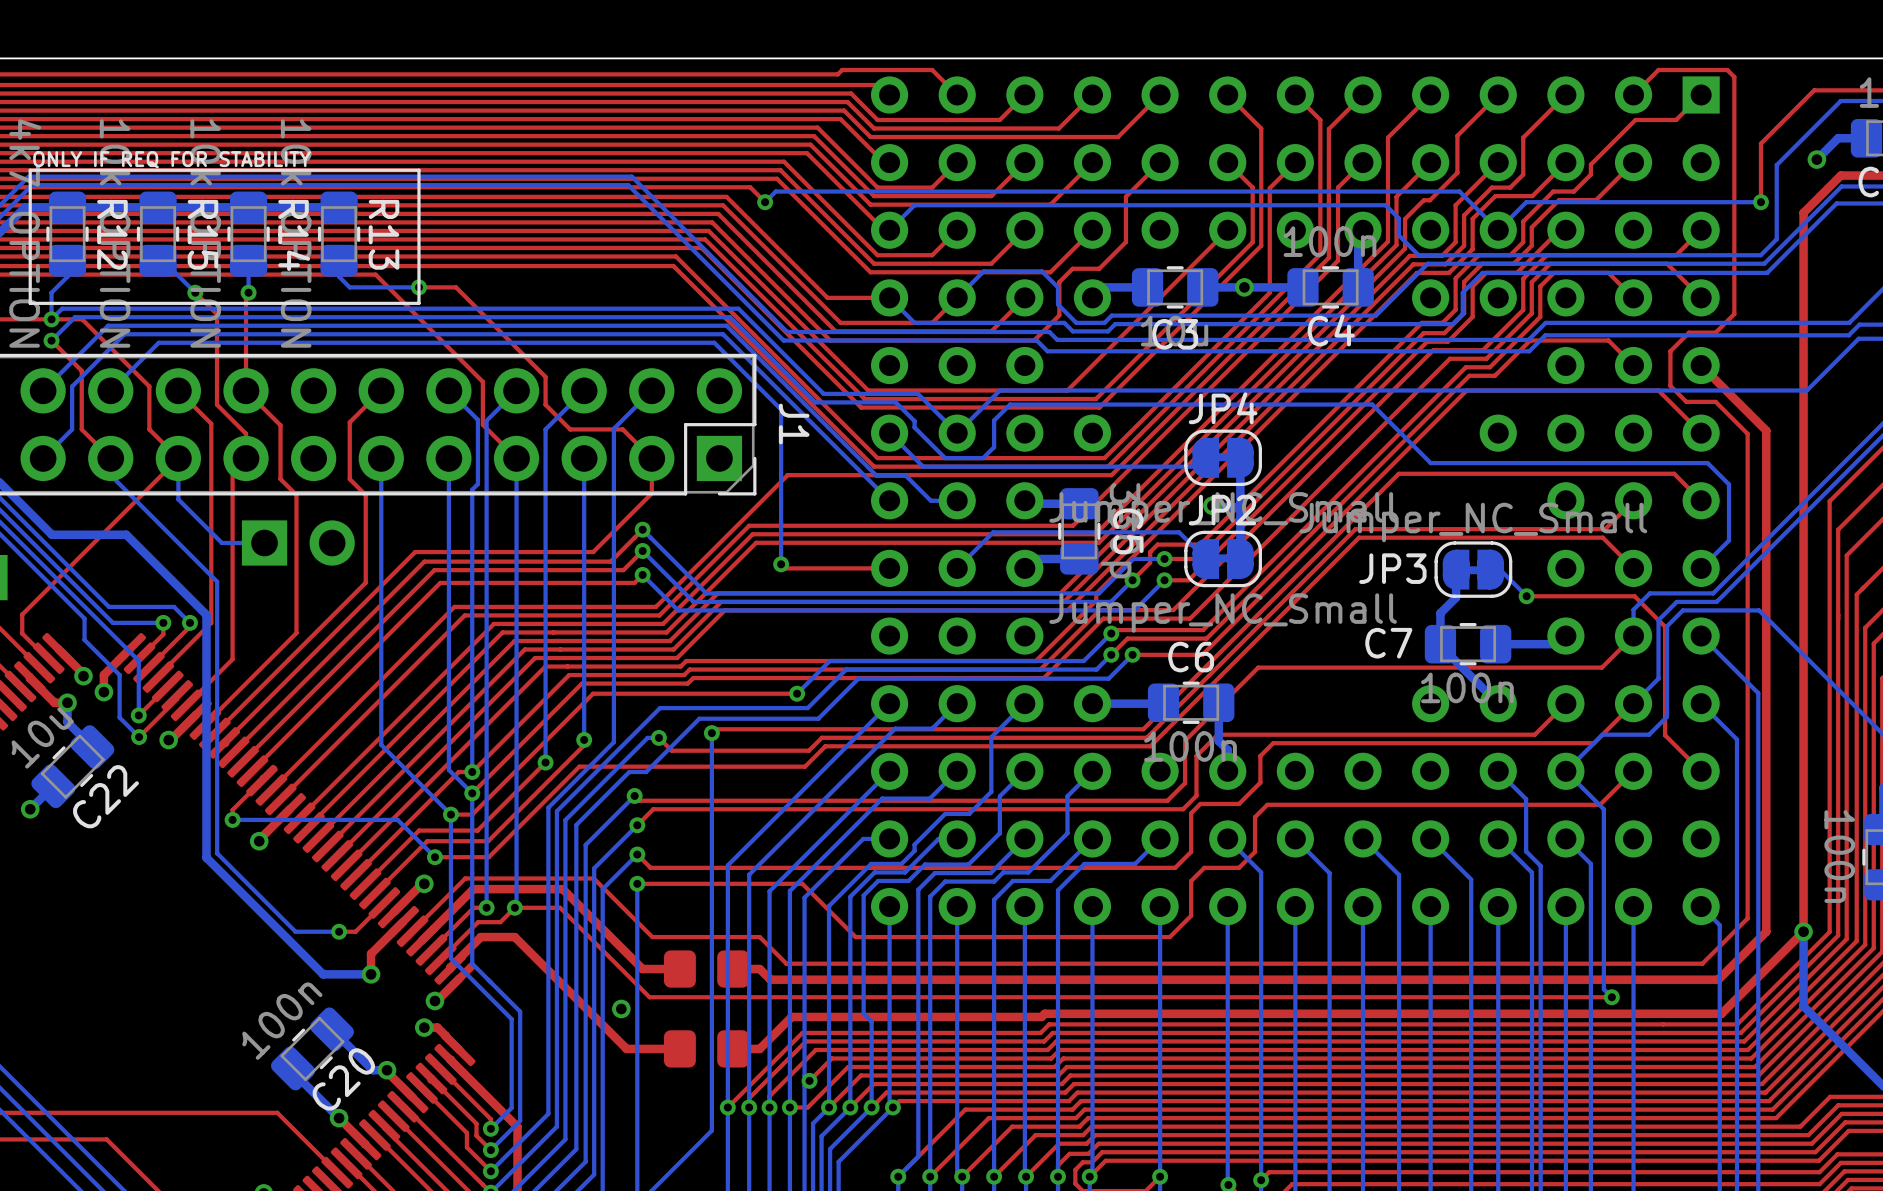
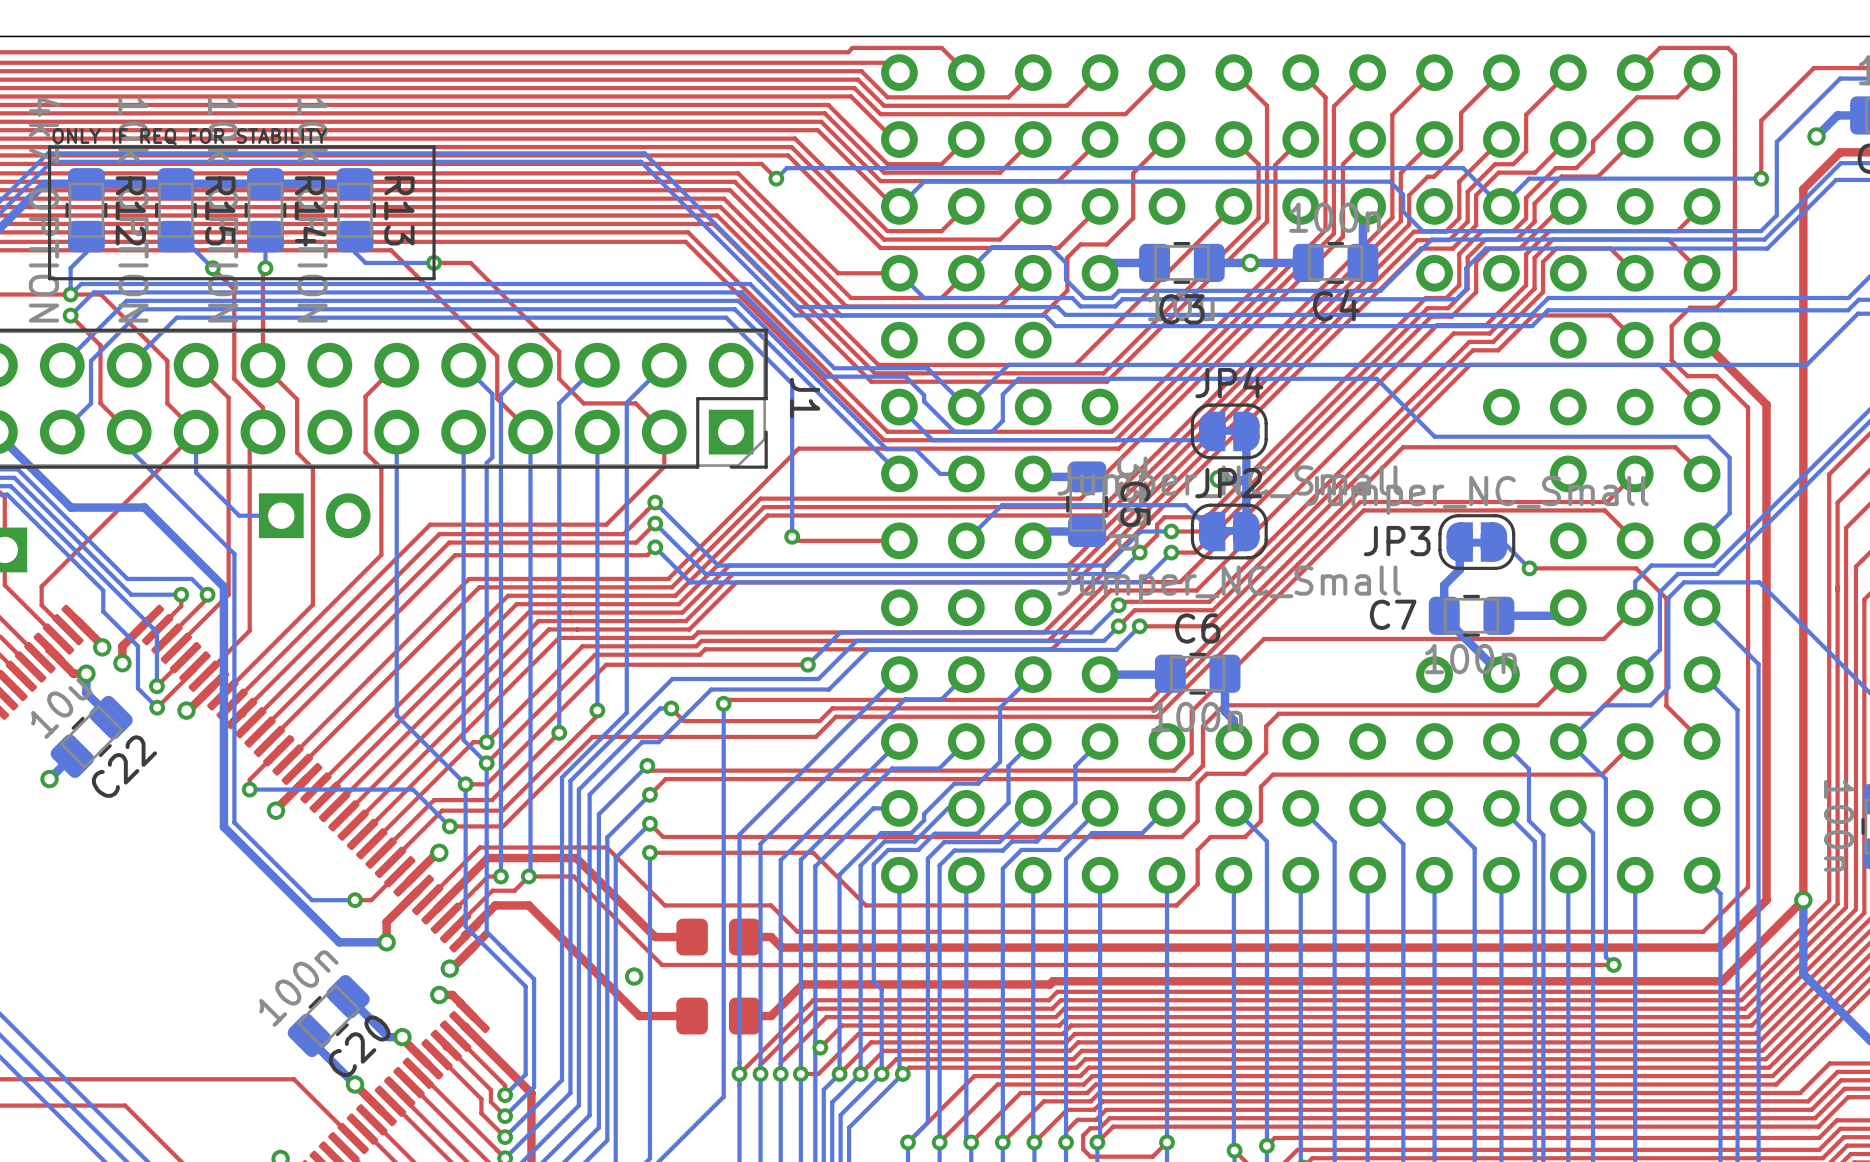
part footprint: [870, 76, 1720, 926] -> [881, 54, 1721, 894]

